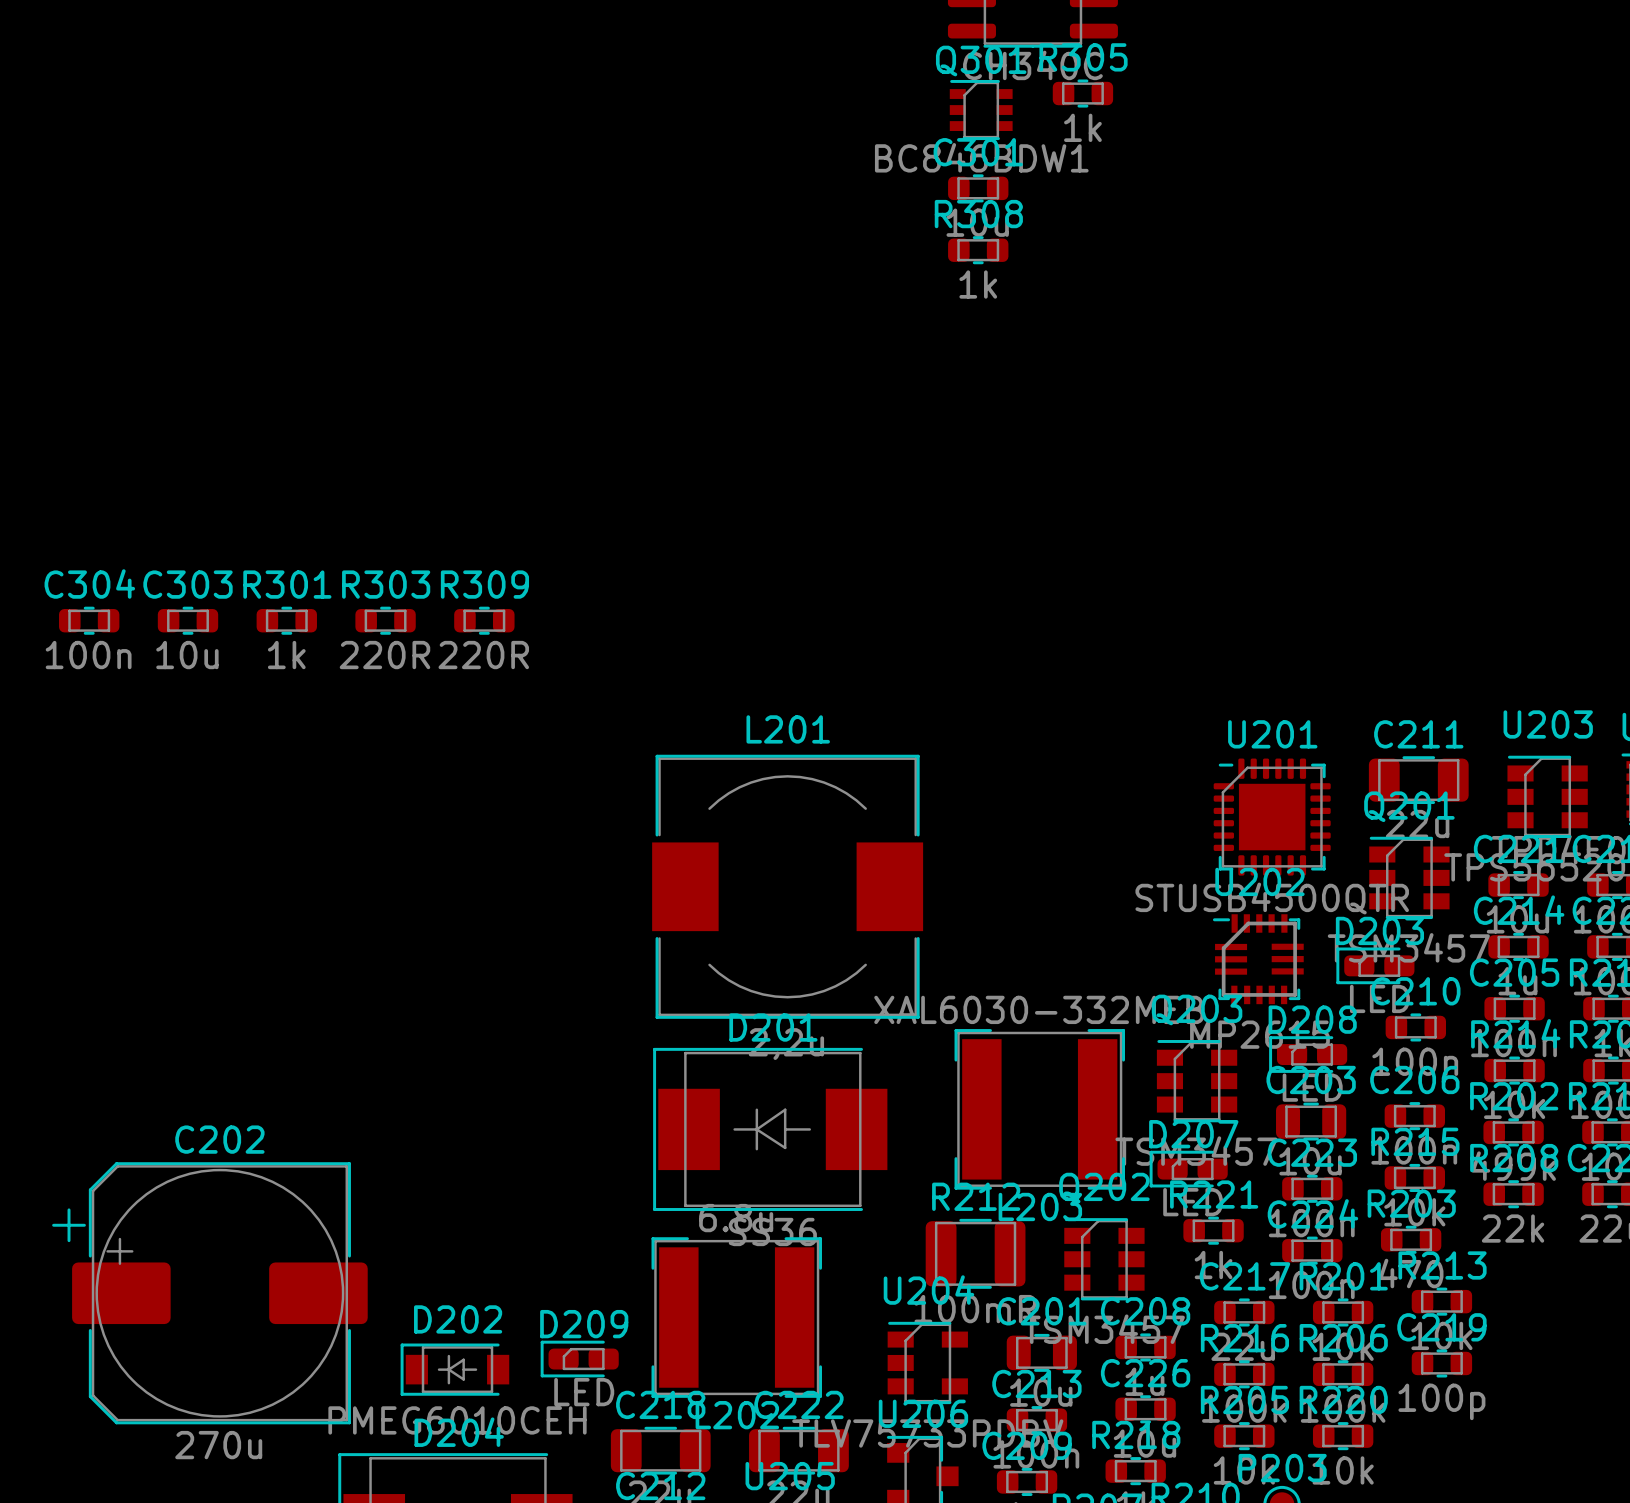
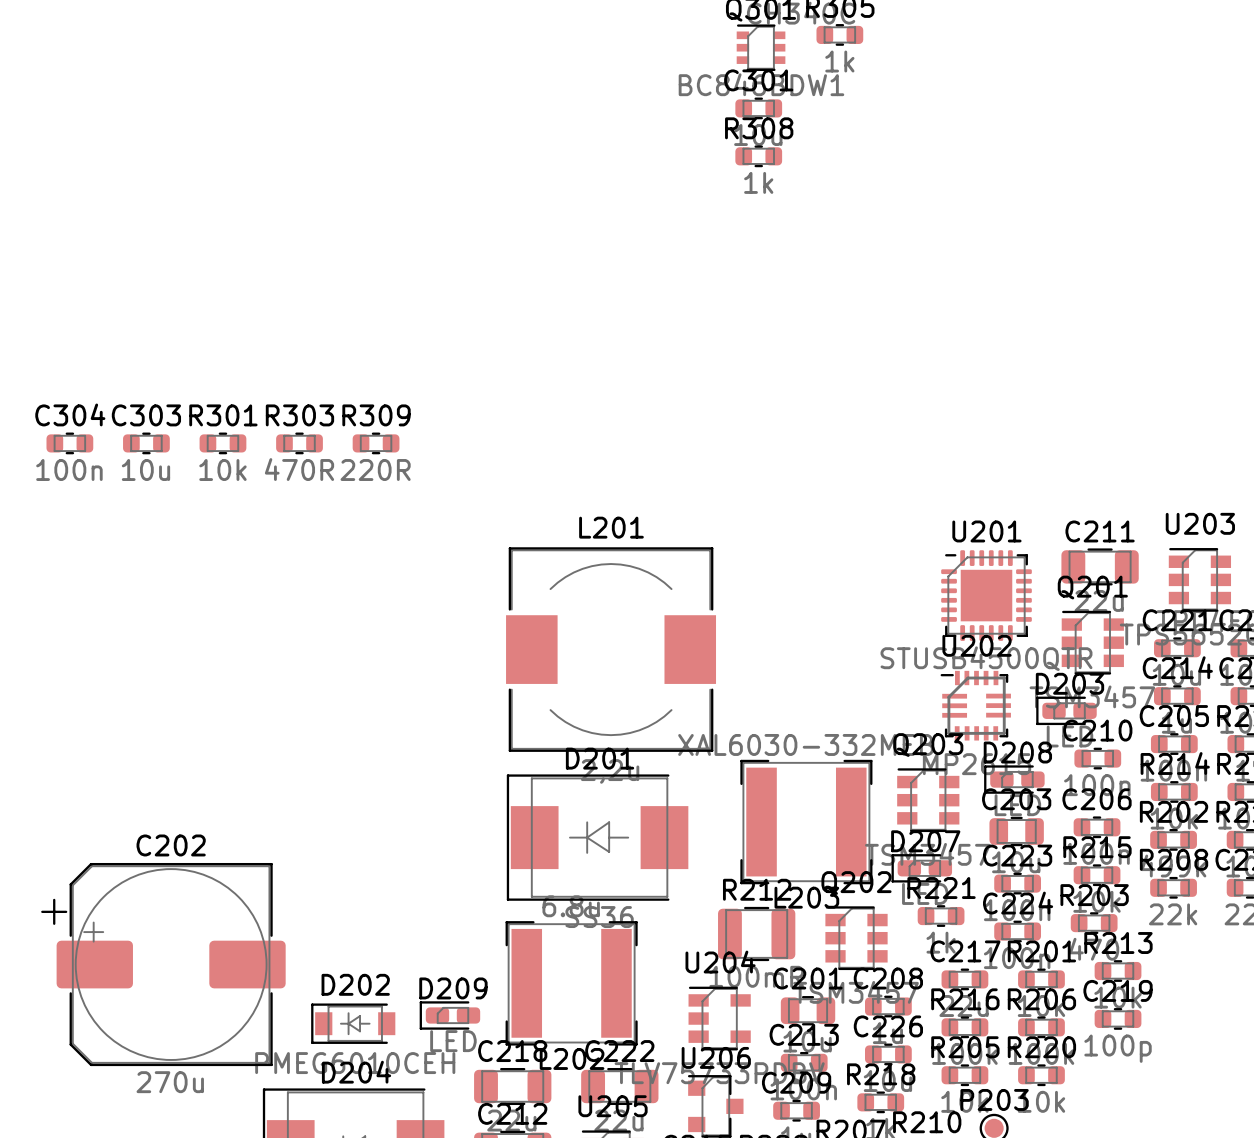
R301 value: 1k (286, 655) -> 10k (222, 470)
R303 value: 220R (384, 655) -> 470R (299, 469)

